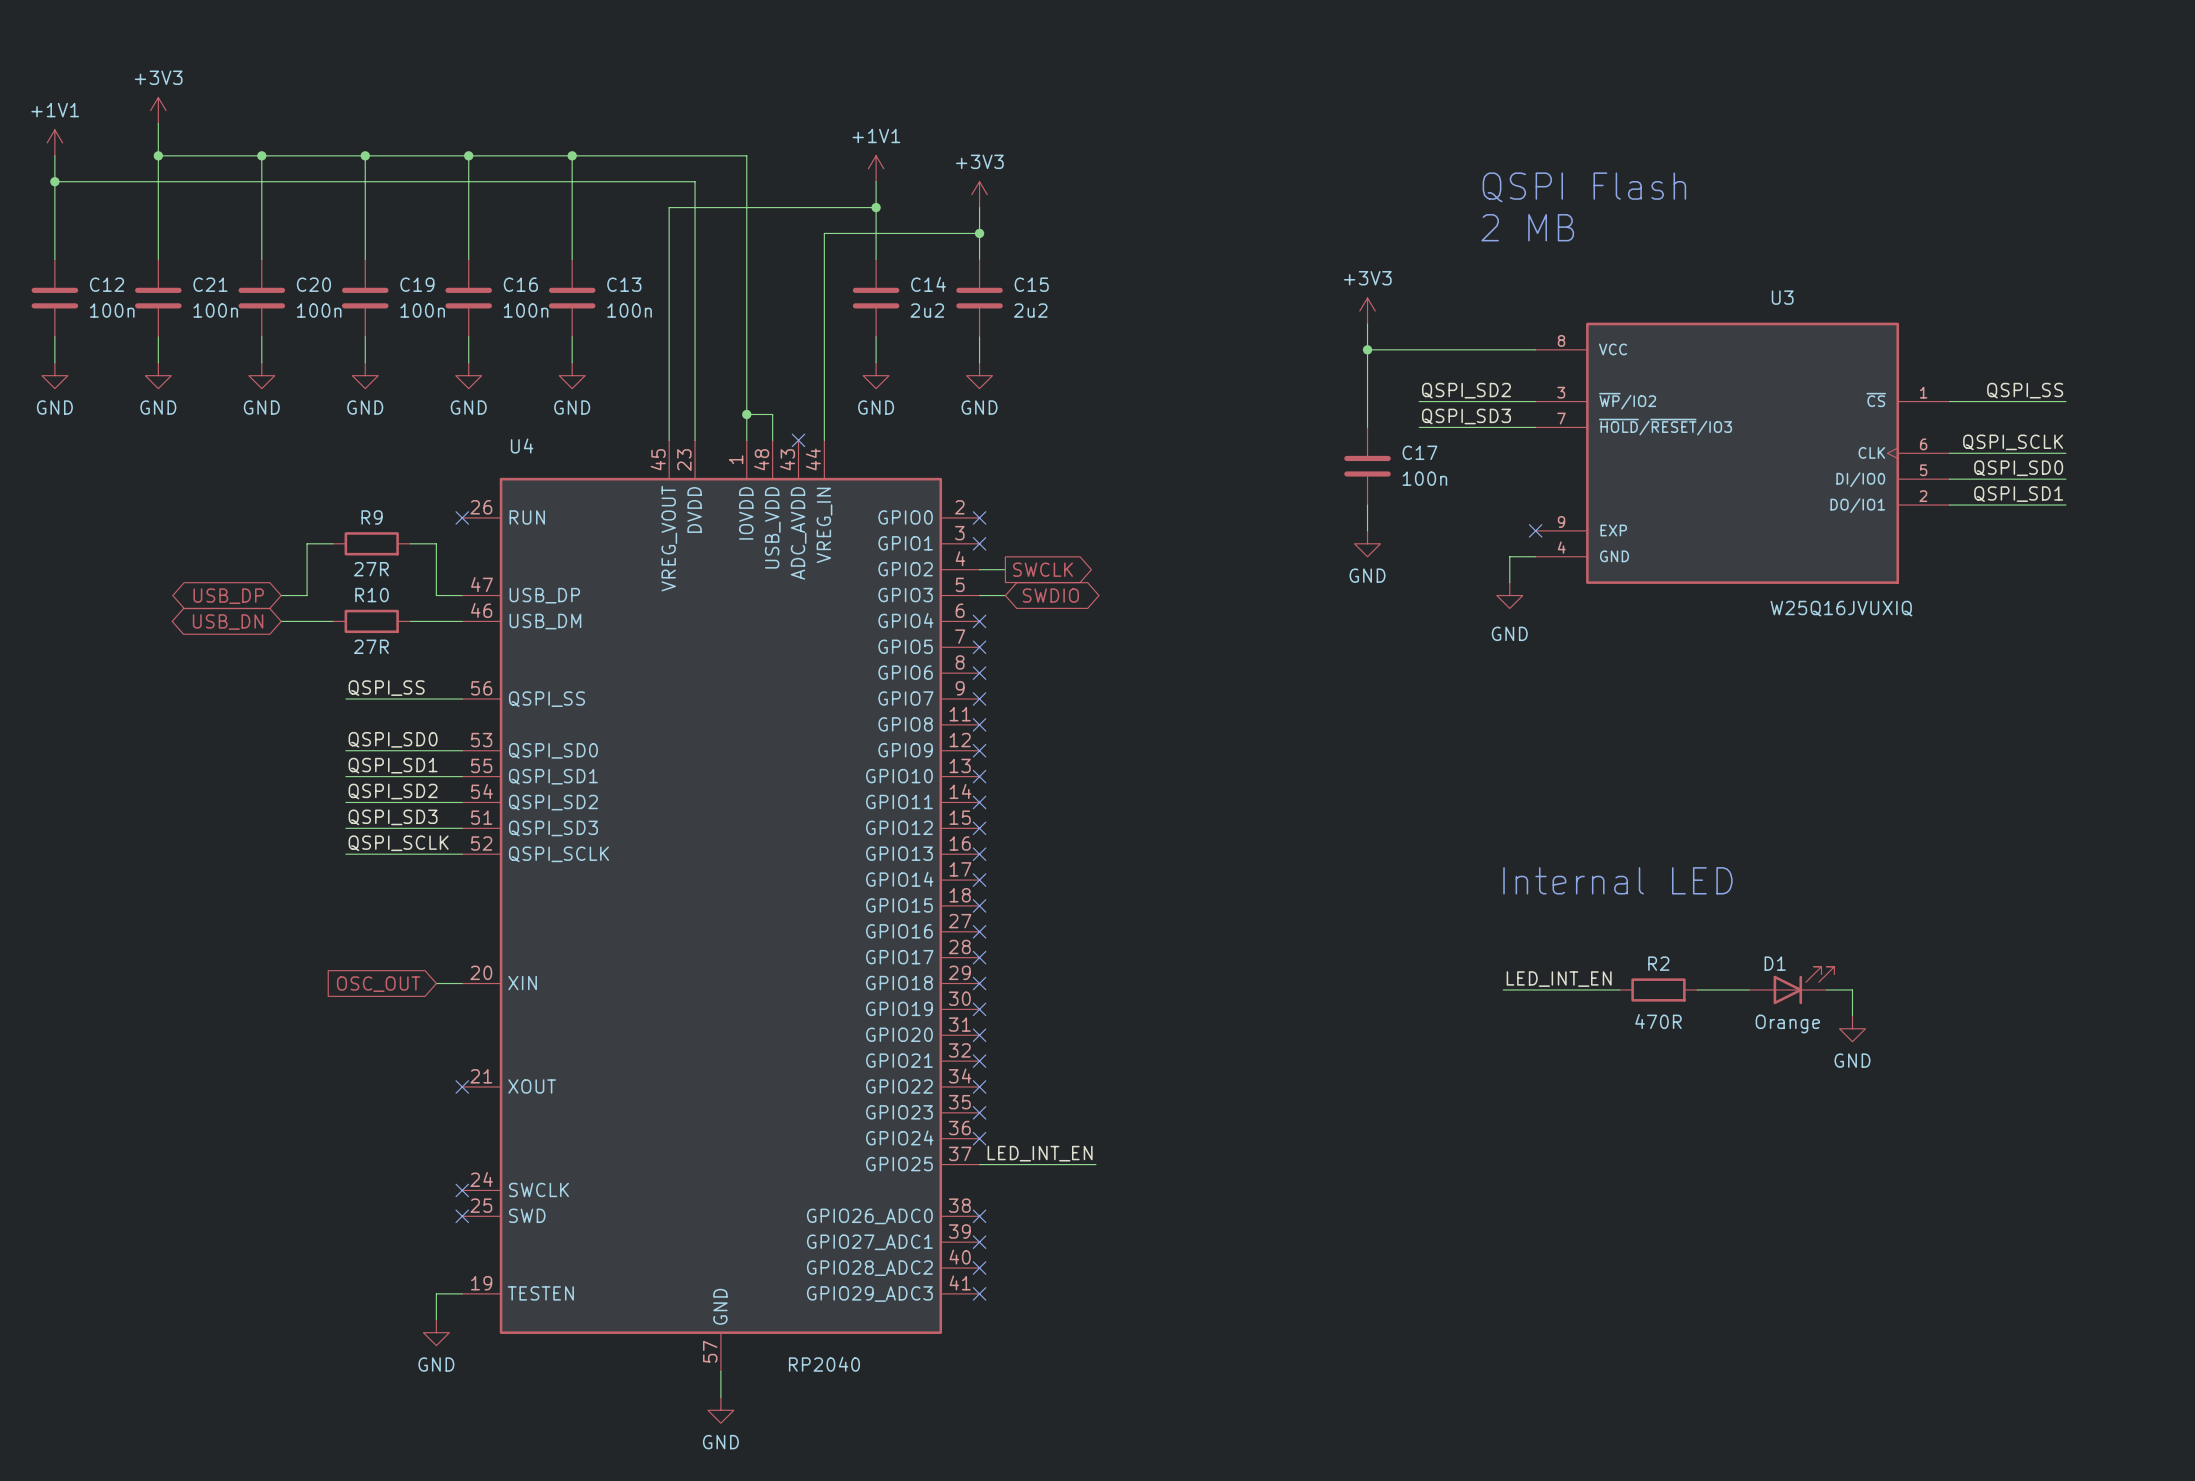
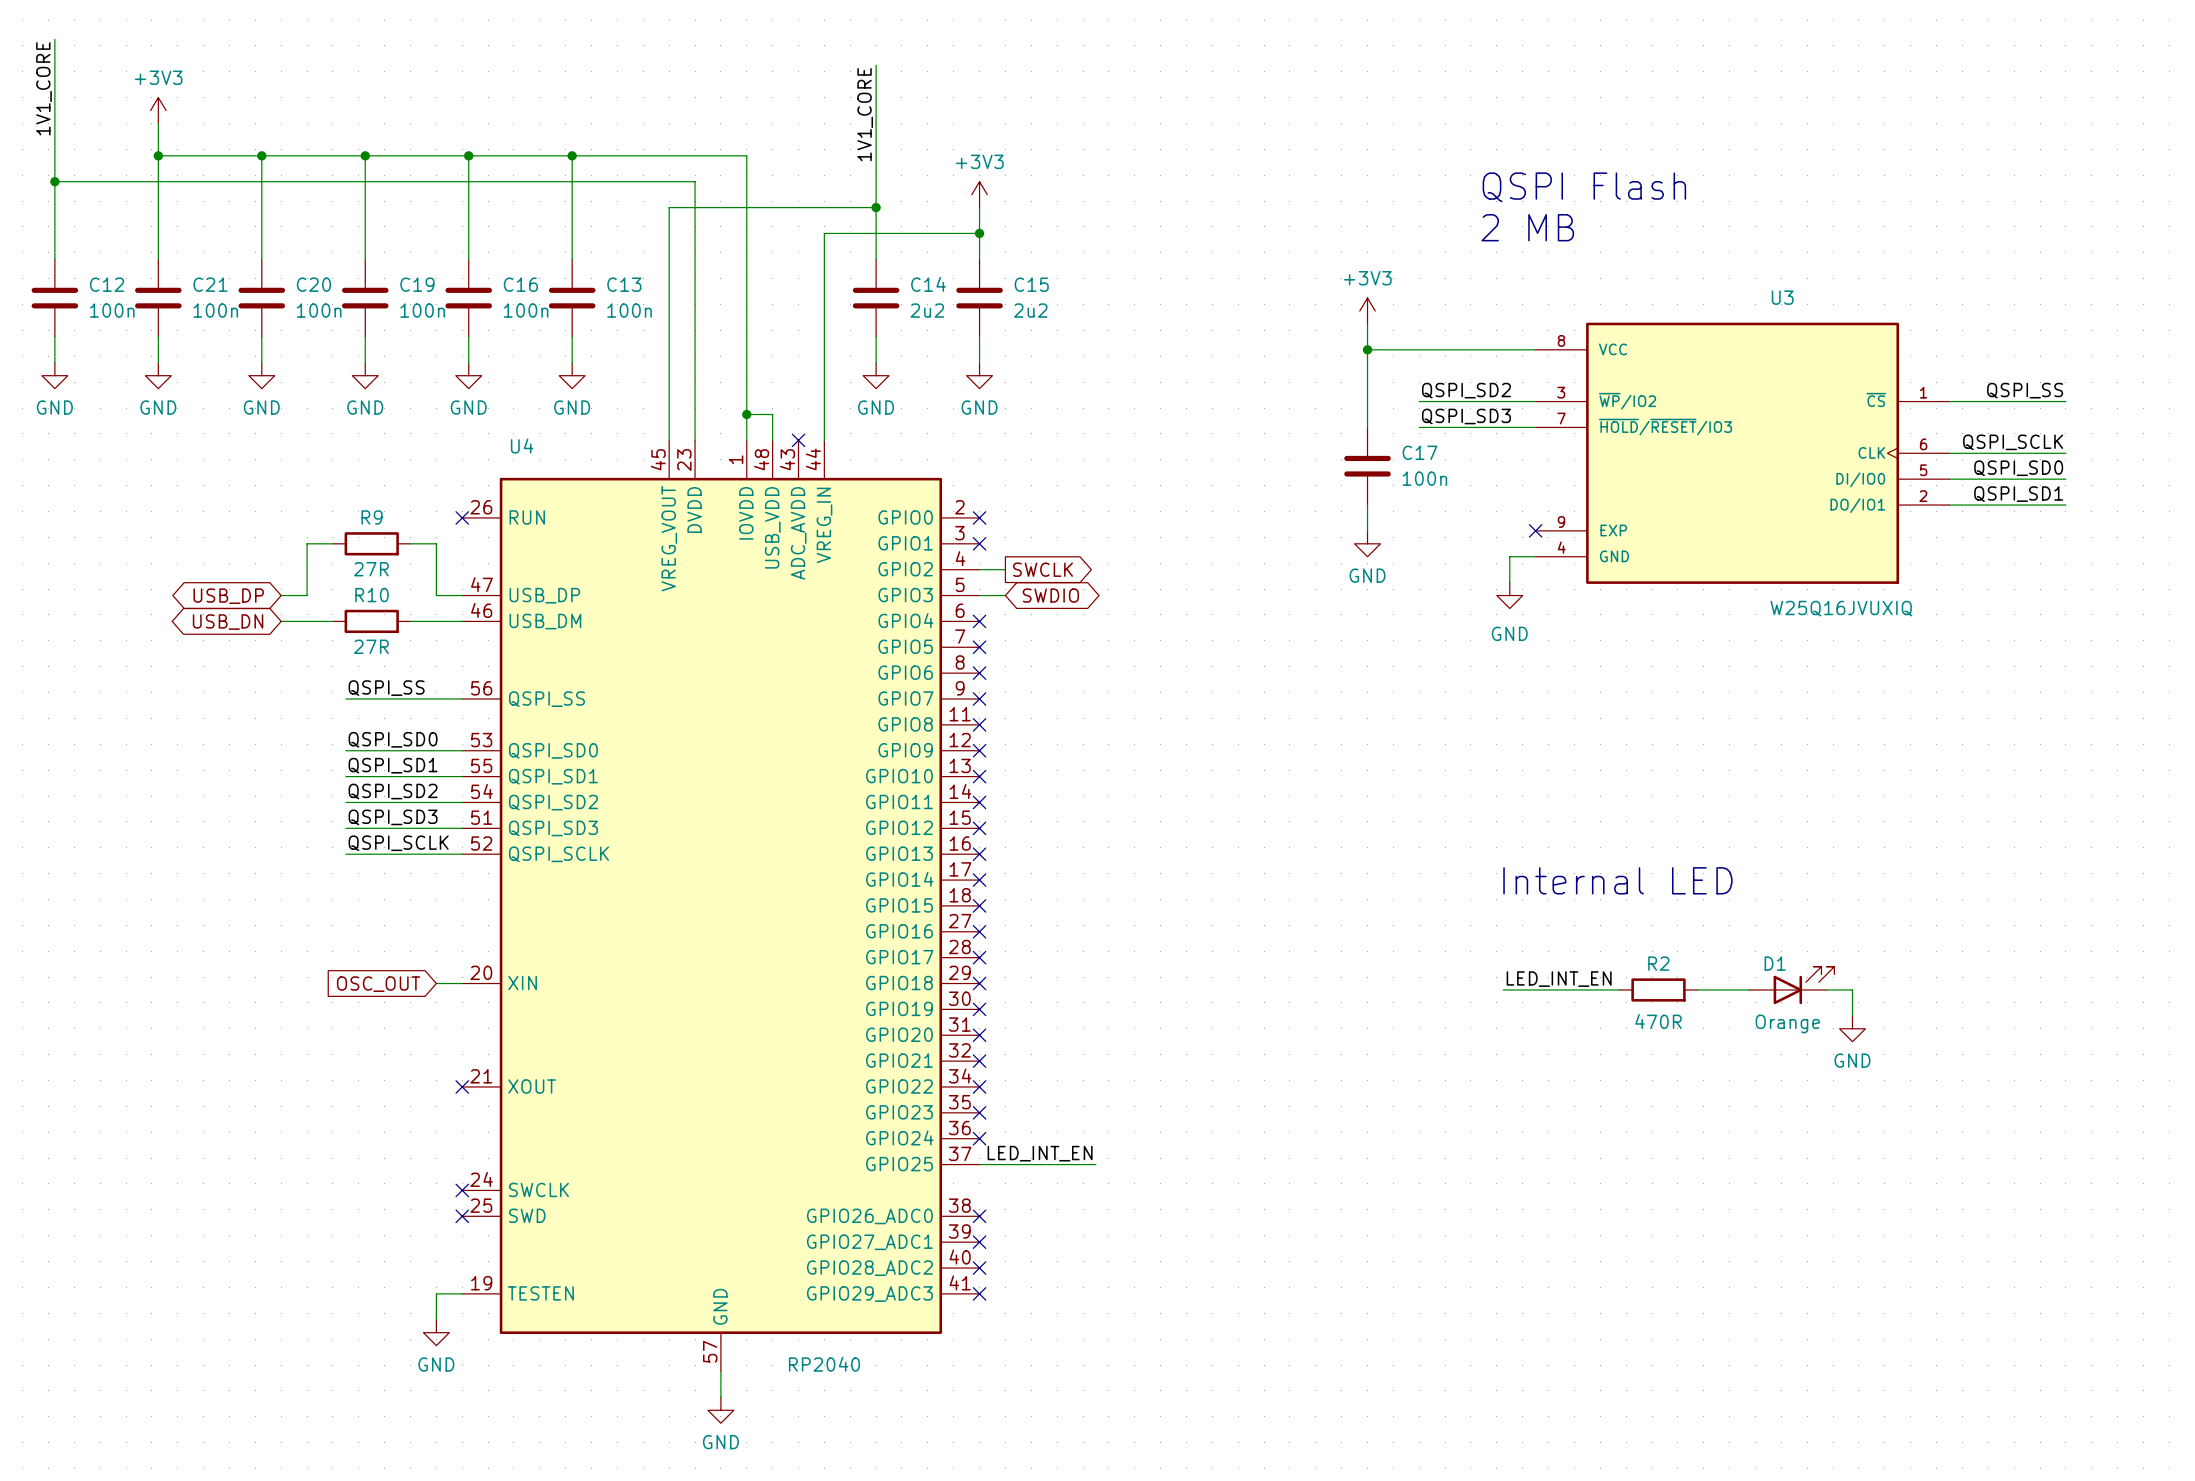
wire: none -> (54, 39) (54, 155)
wire: none -> (876, 65) (876, 181)
label: none -> 1V1_CORE (43, 88)
label: none -> 1V1_CORE (865, 114)
power symbol: +1V1 (54, 142) -> none
power symbol: +1V1 (876, 168) -> none

